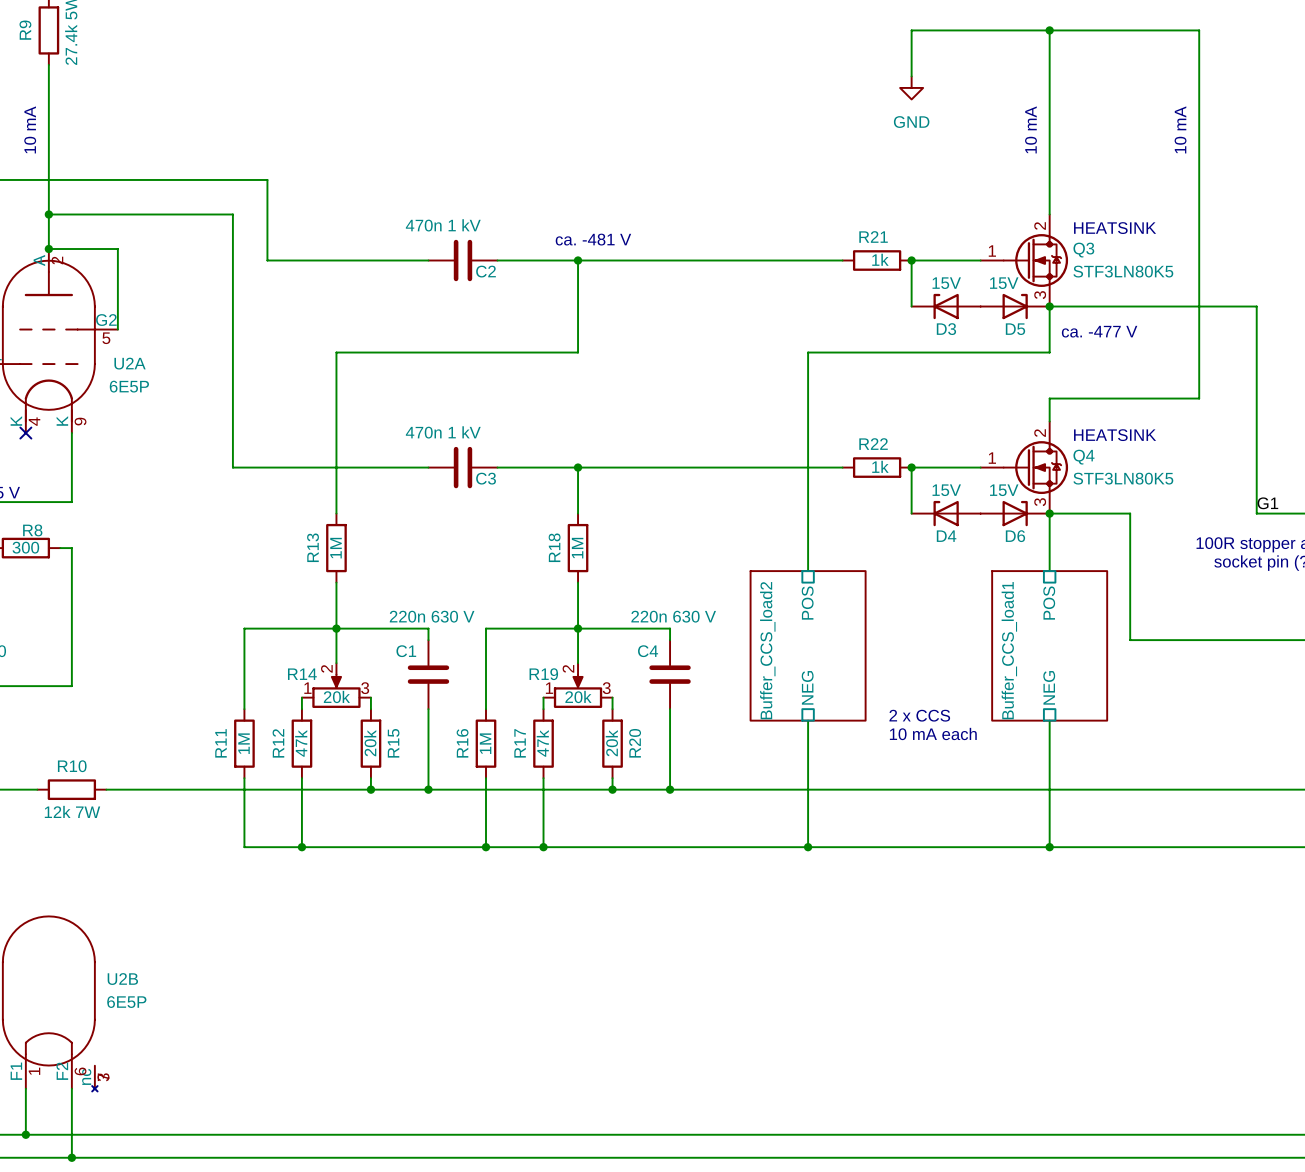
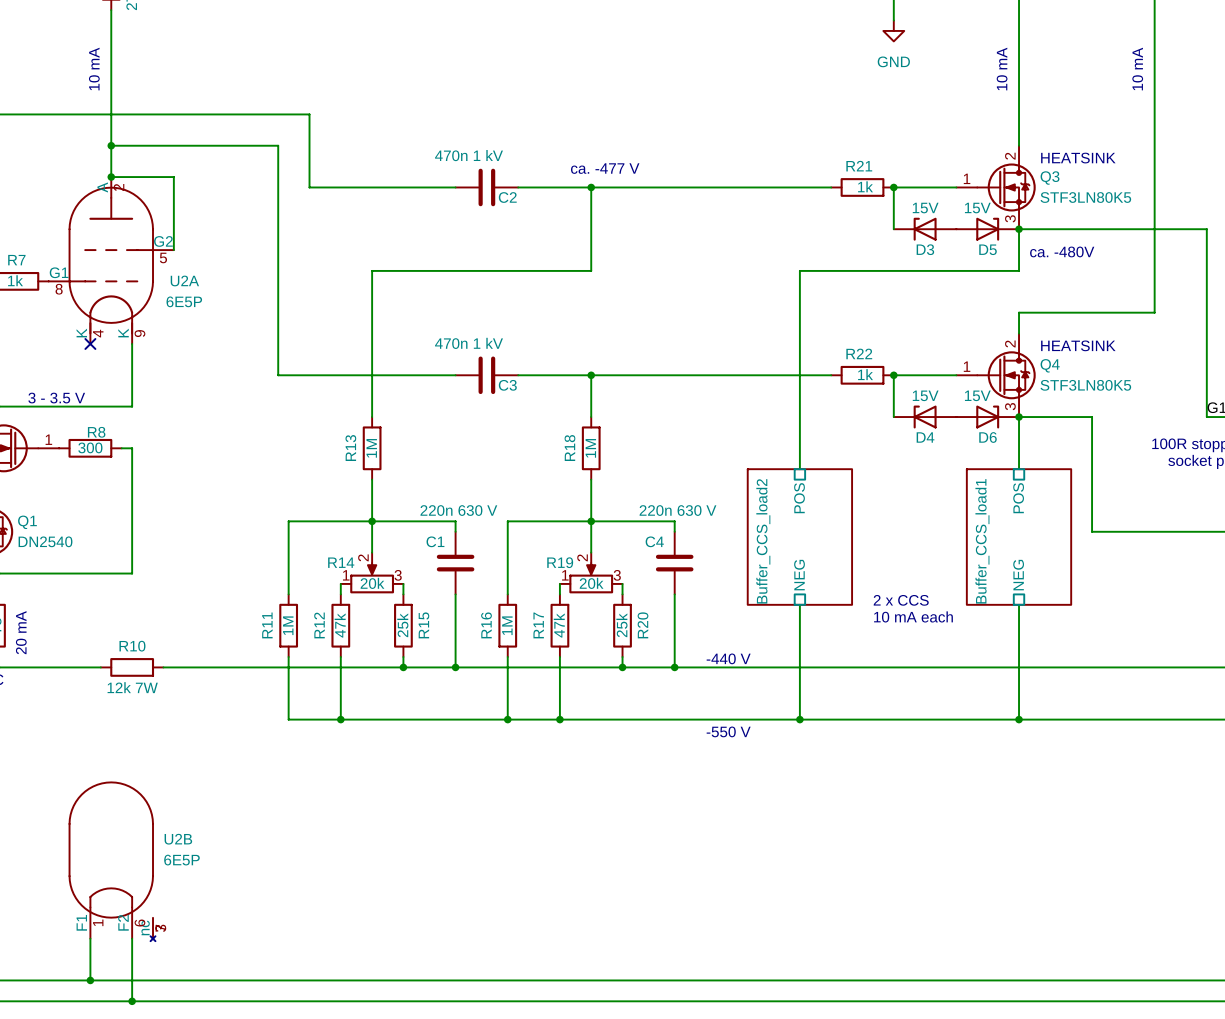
text: ca. -481 V (593, 239) -> ca. -477 V (605, 168)
text: ca. -477 V (1099, 331) -> ca. -480V (1062, 251)
R15 value: 20k (370, 743) -> 25k (402, 625)
R20 value: 20k (611, 743) -> 25k (621, 625)
text: none -> -440 V (728, 658)
text: none -> -550 V (728, 731)

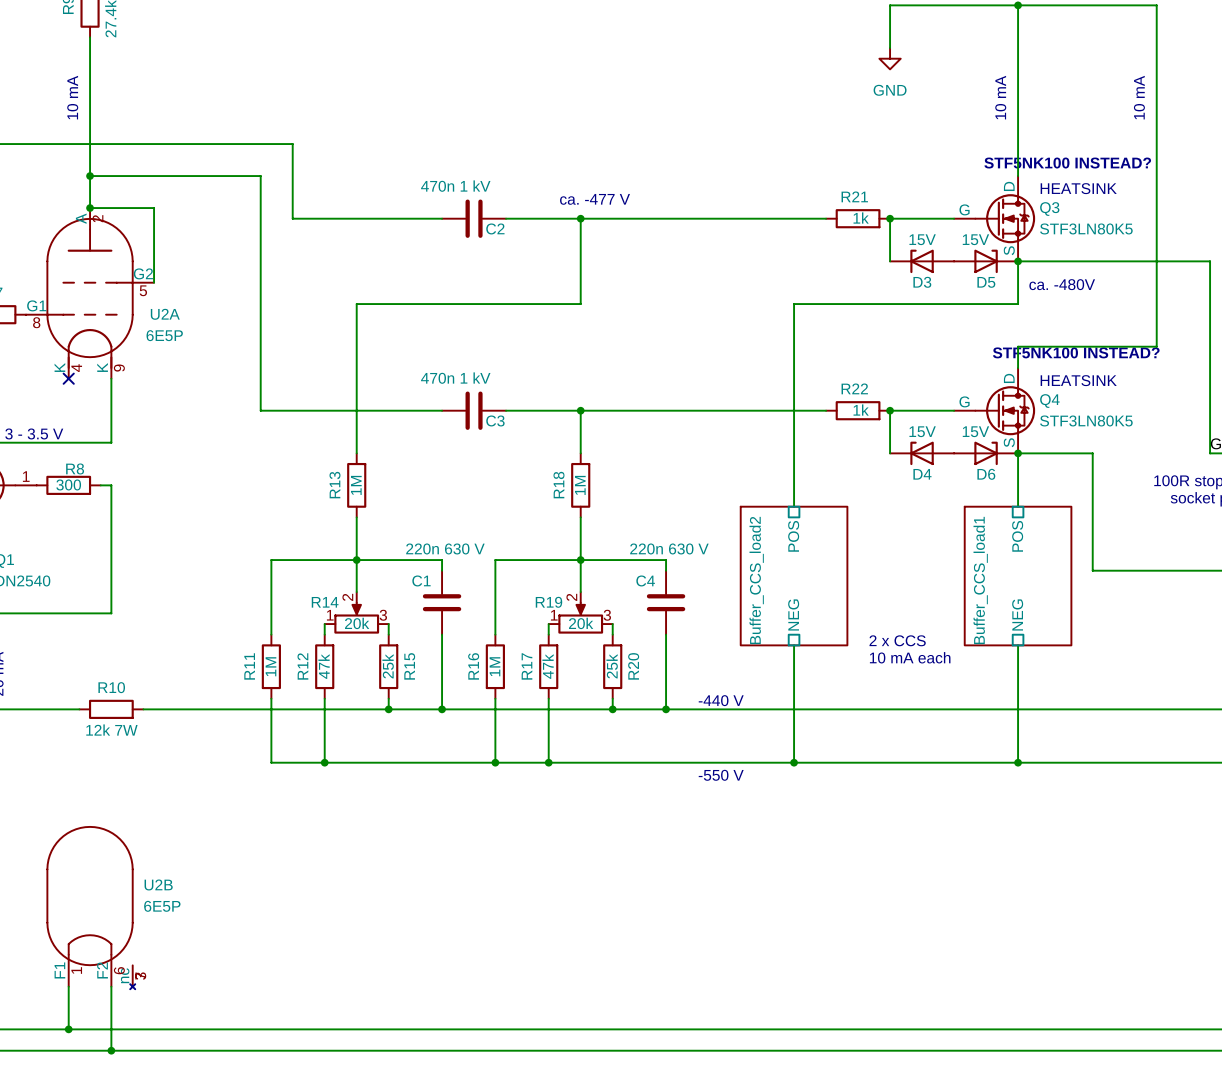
text: none -> STF5NK100 INSTEAD? (1067, 163)
Q3 symbol: [956, 145, 1036, 230] -> [954, 176, 1036, 262]
text: none -> STF5NK100 INSTEAD? (1076, 352)
Q4 symbol: [956, 333, 1036, 418] -> [954, 368, 1036, 454]

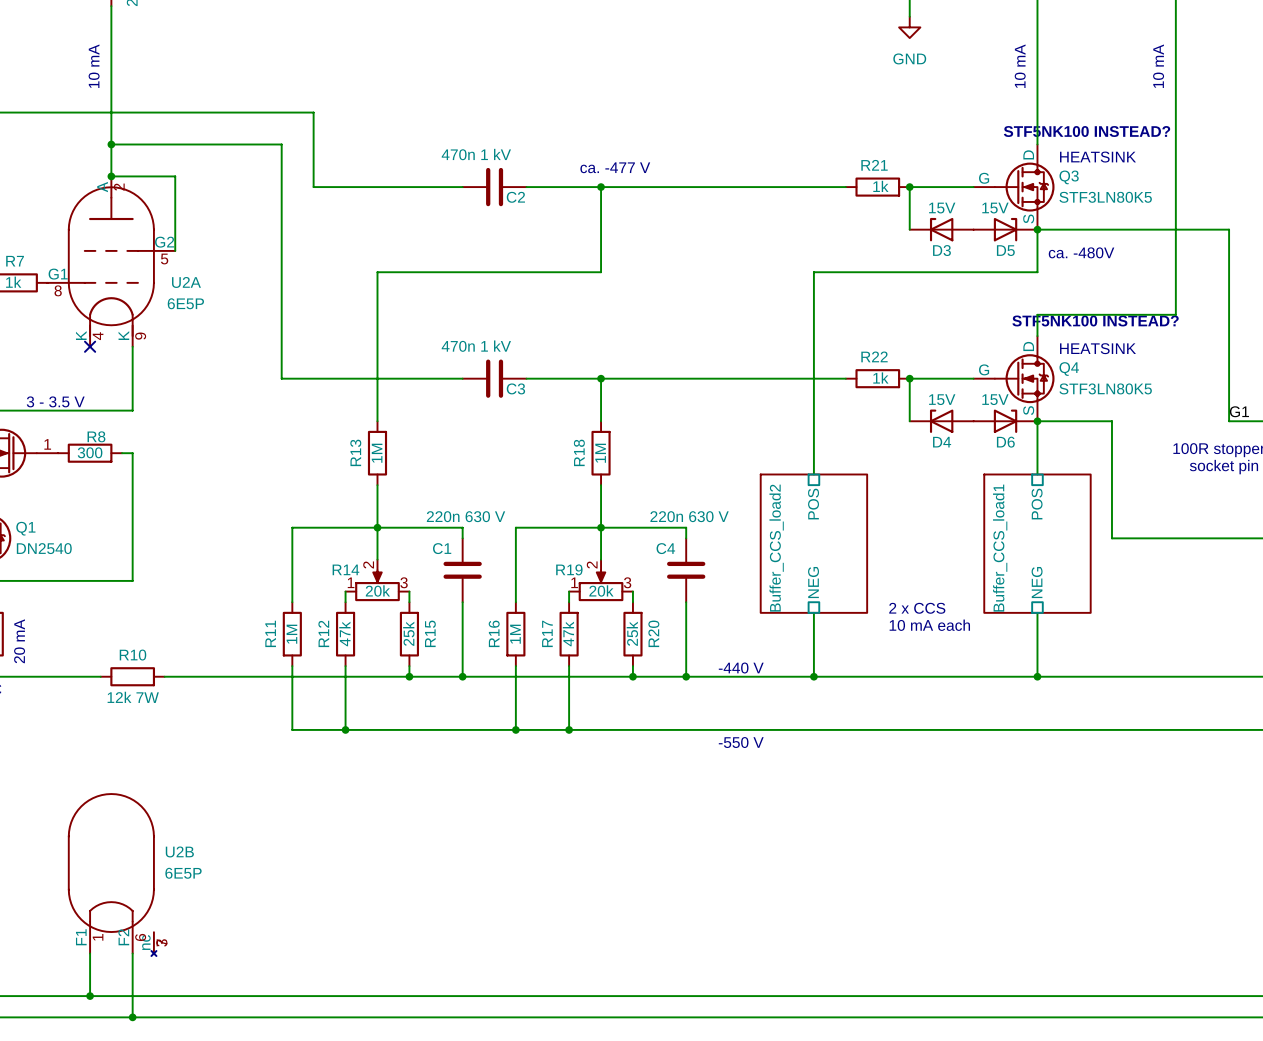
wire: (794, 709) (794, 762) -> none
junction: none -> (813, 676)
wire: (1018, 709) (1018, 762) -> none
junction: none -> (1037, 676)
junction: (794, 762) -> none
junction: (1018, 762) -> none

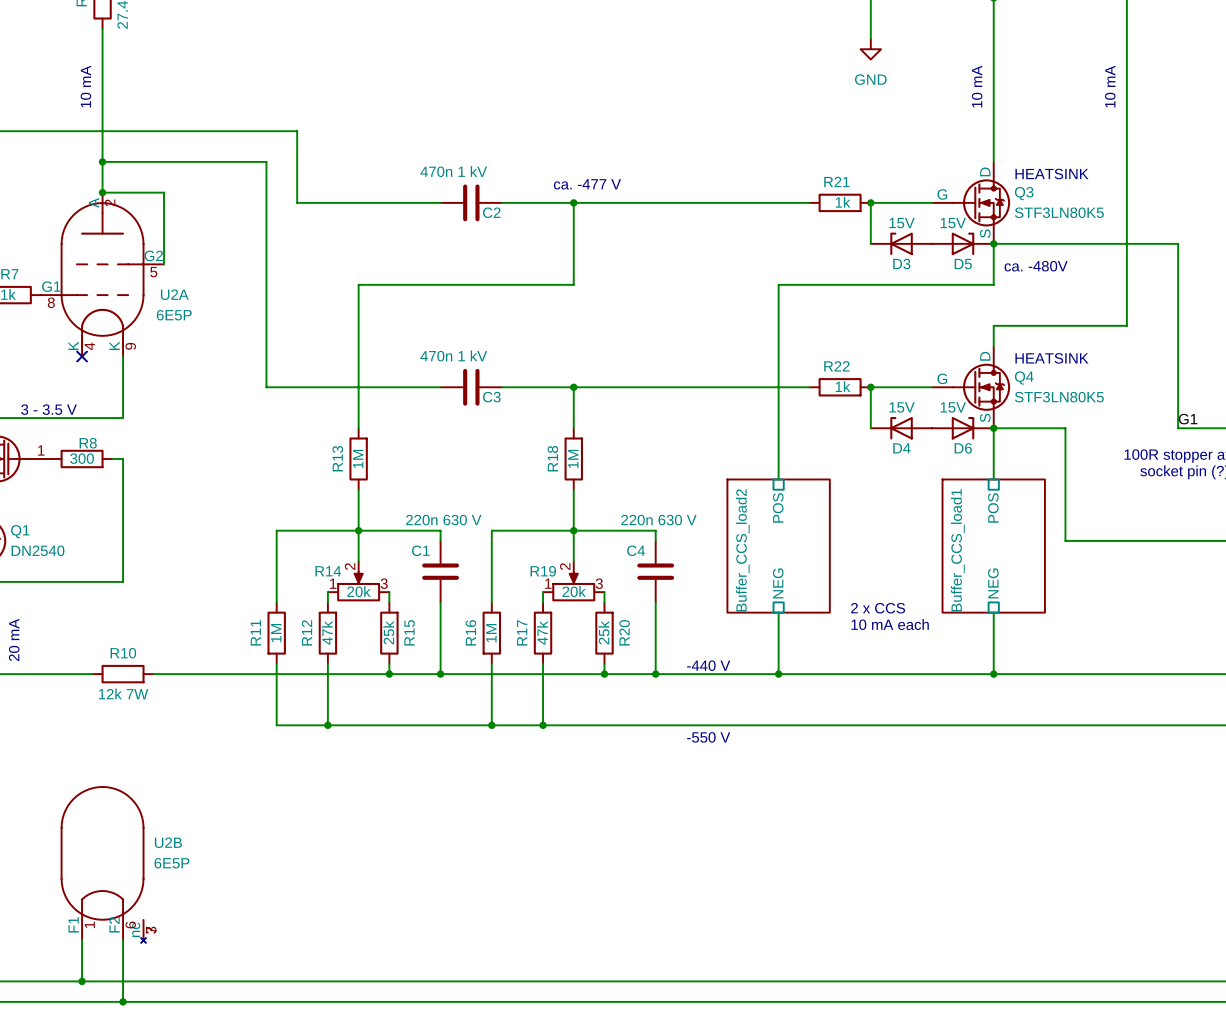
text: STF5NK100 INSTEAD? (1087, 131) -> none
text: STF5NK100 INSTEAD? (1095, 320) -> none

